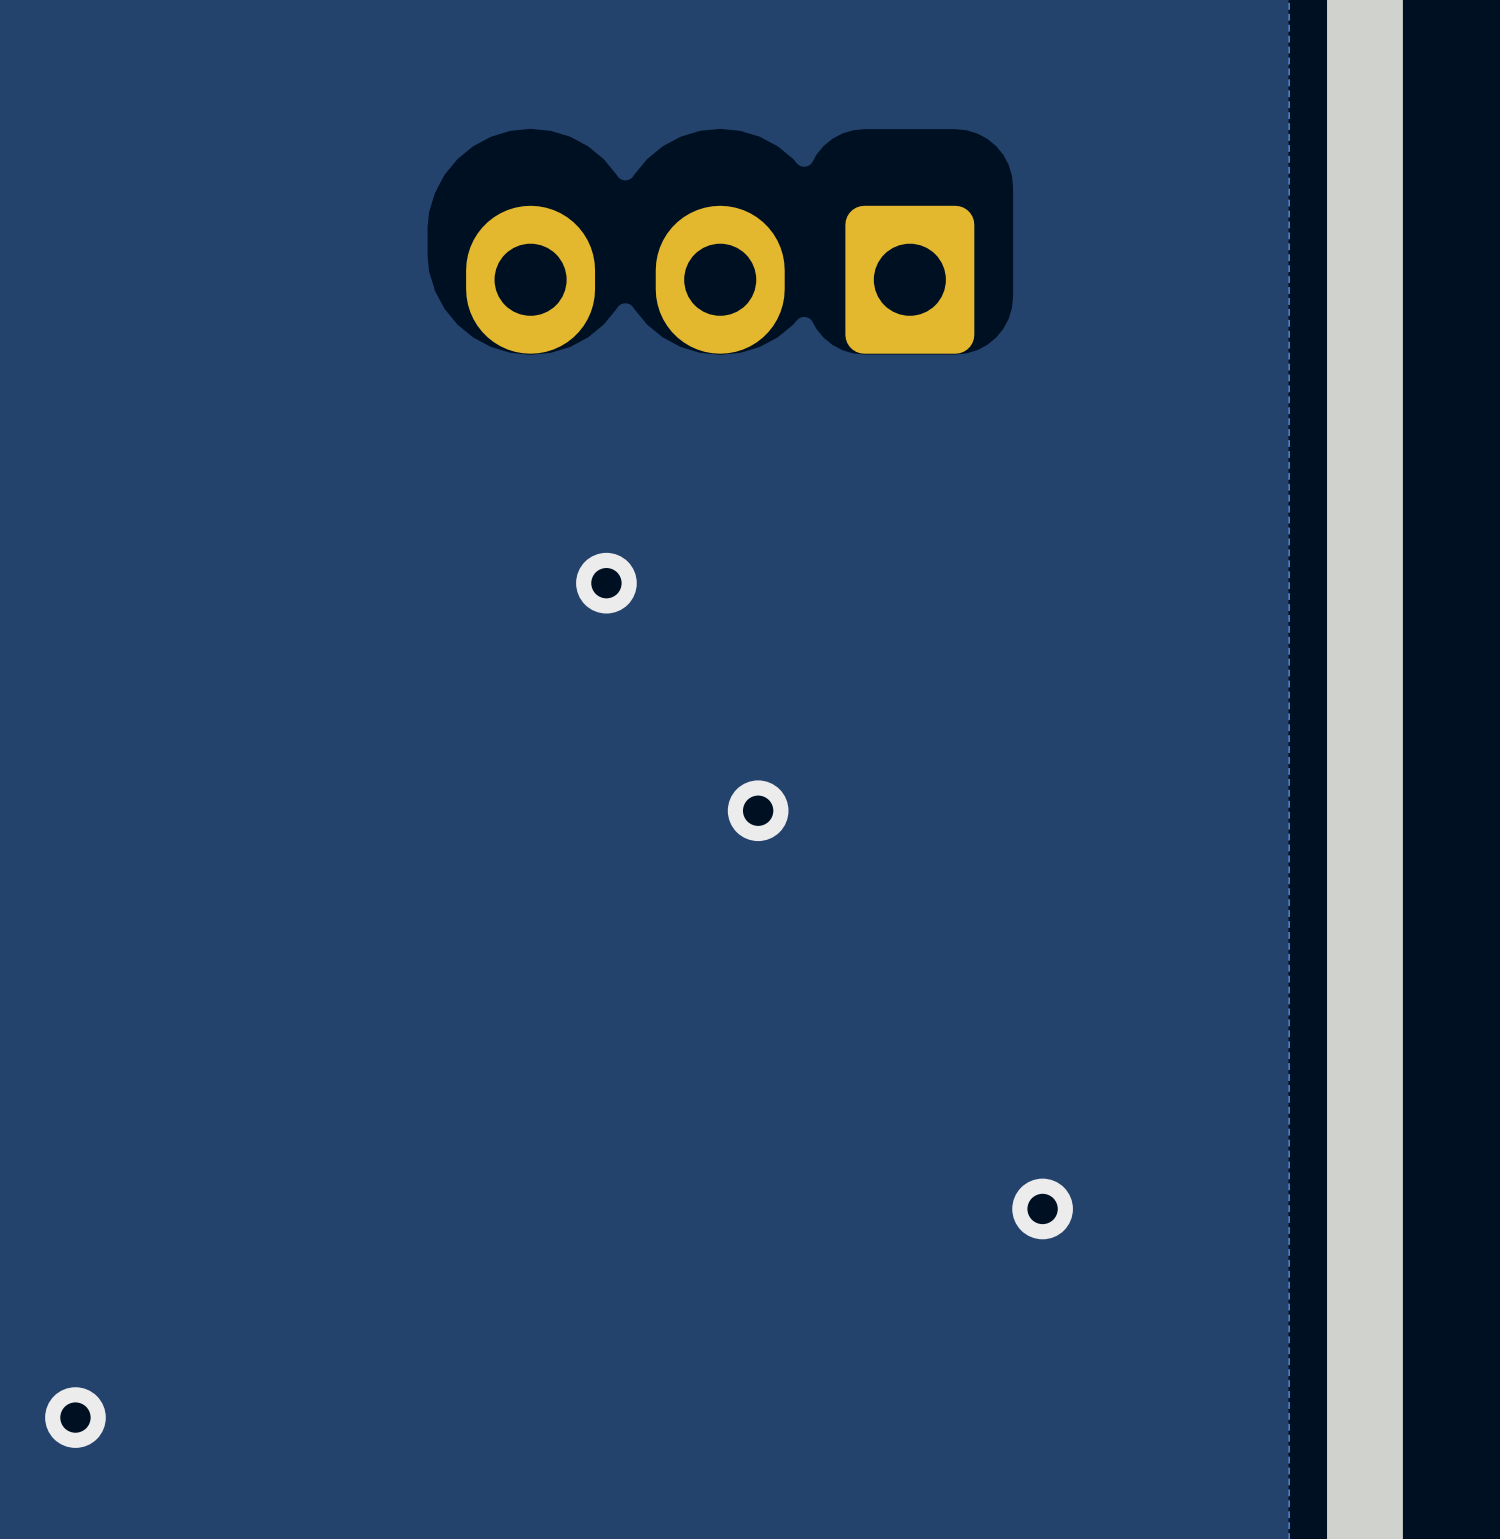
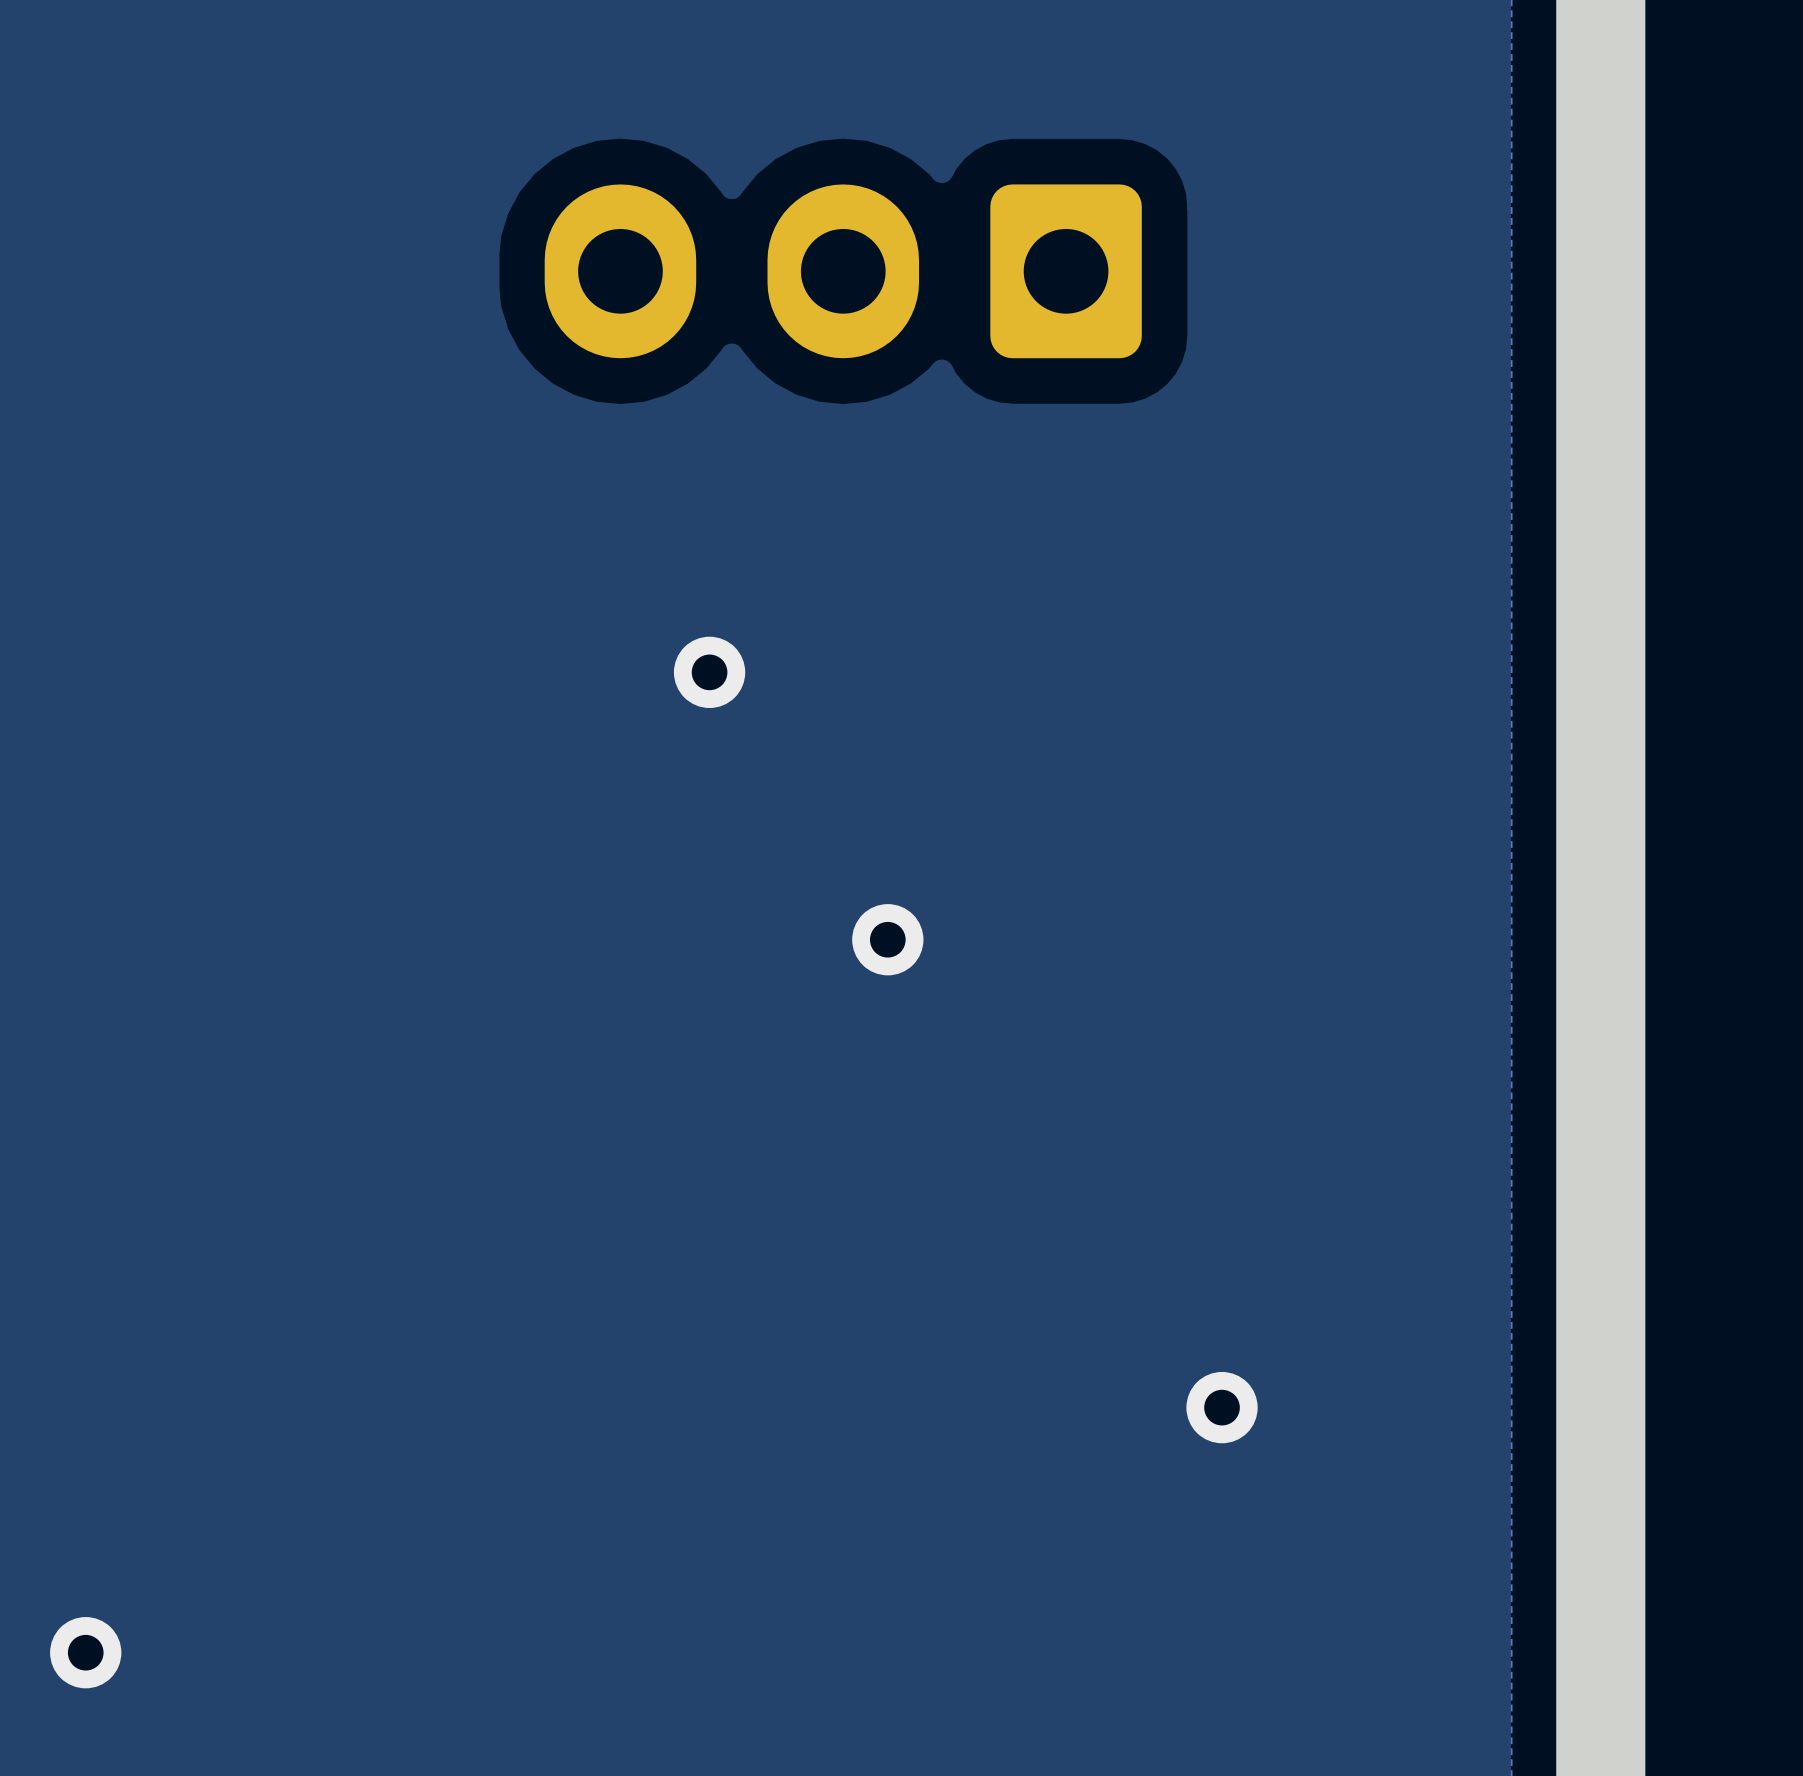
part position: (720, 279) -> (843, 271)

